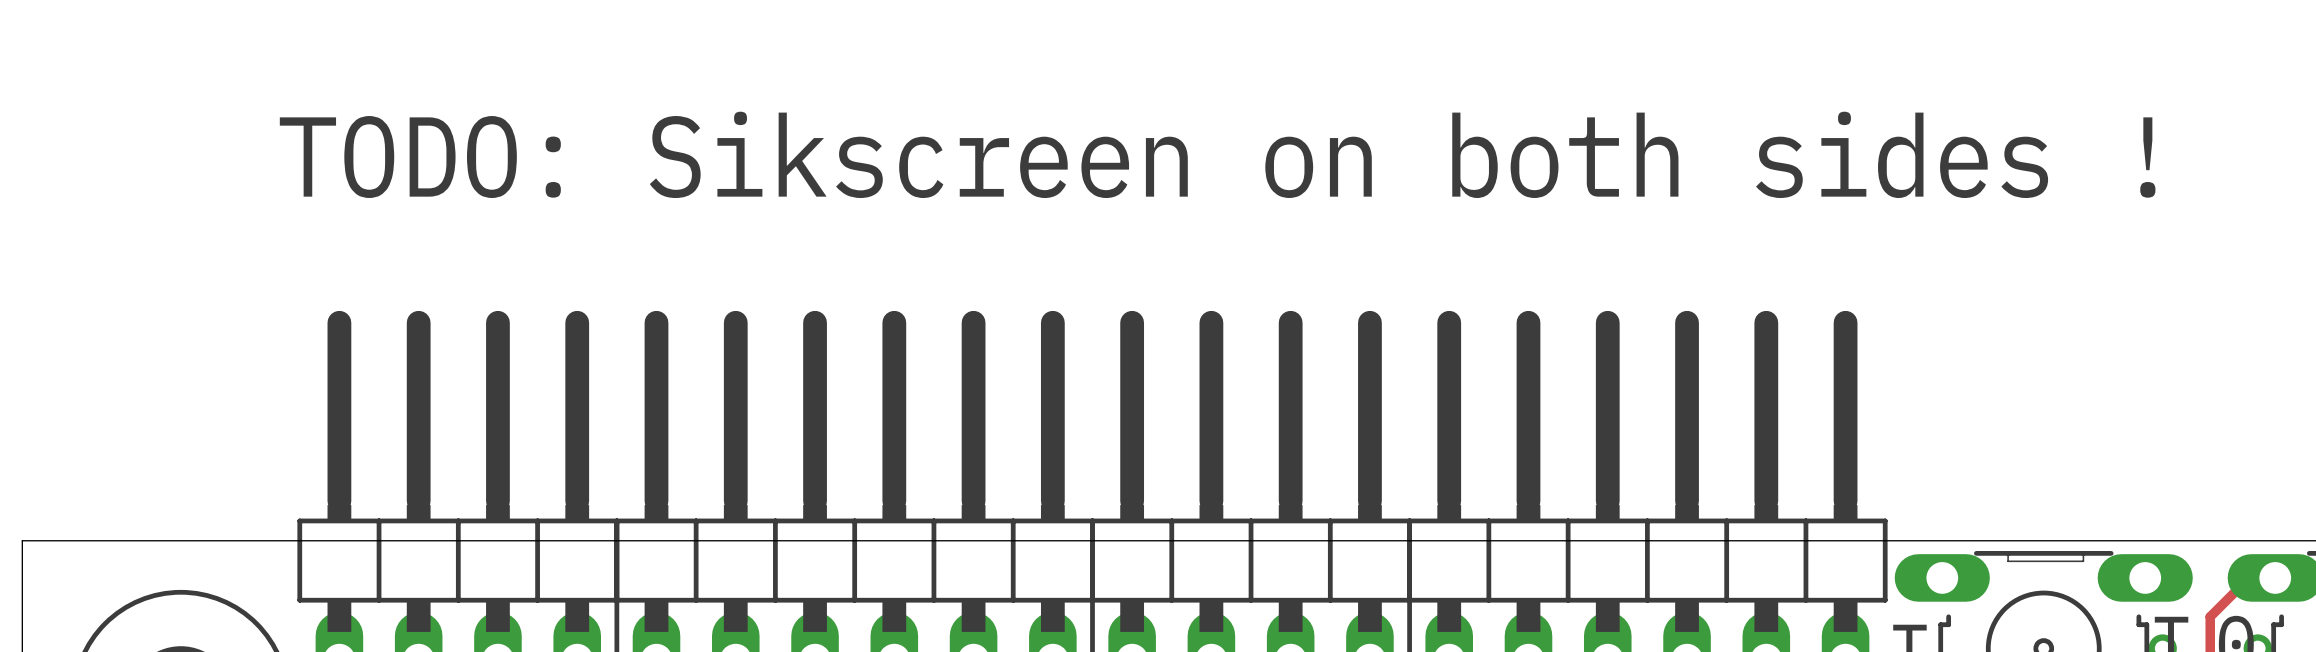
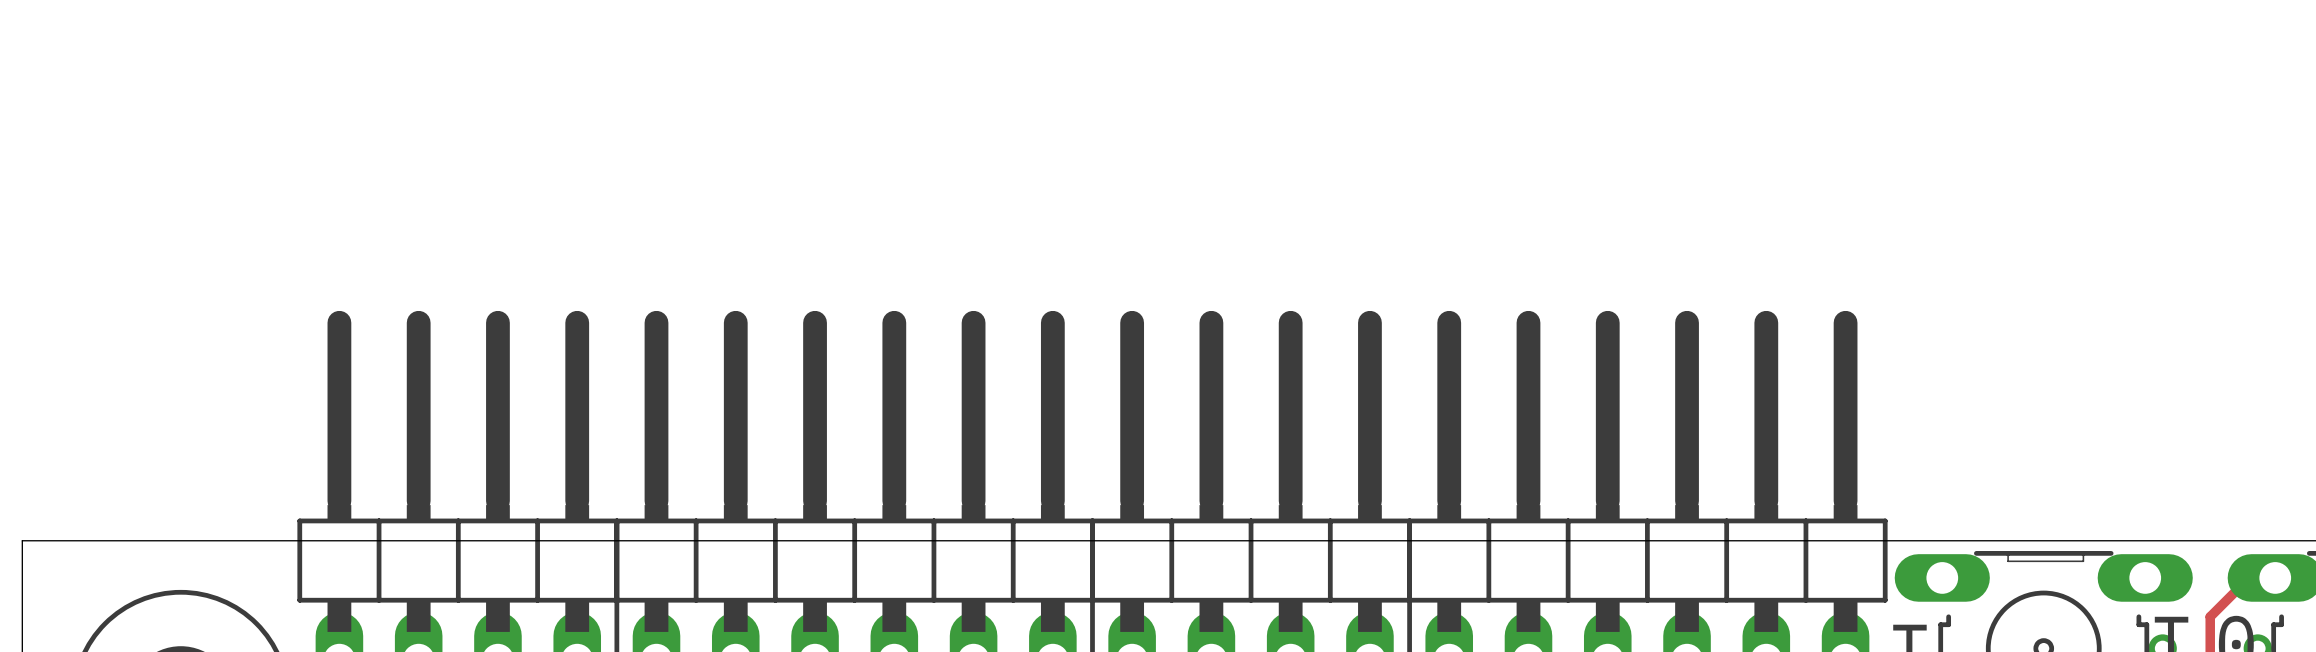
text: TODO: Sikscreen on both sides ! (1217, 154) -> none

